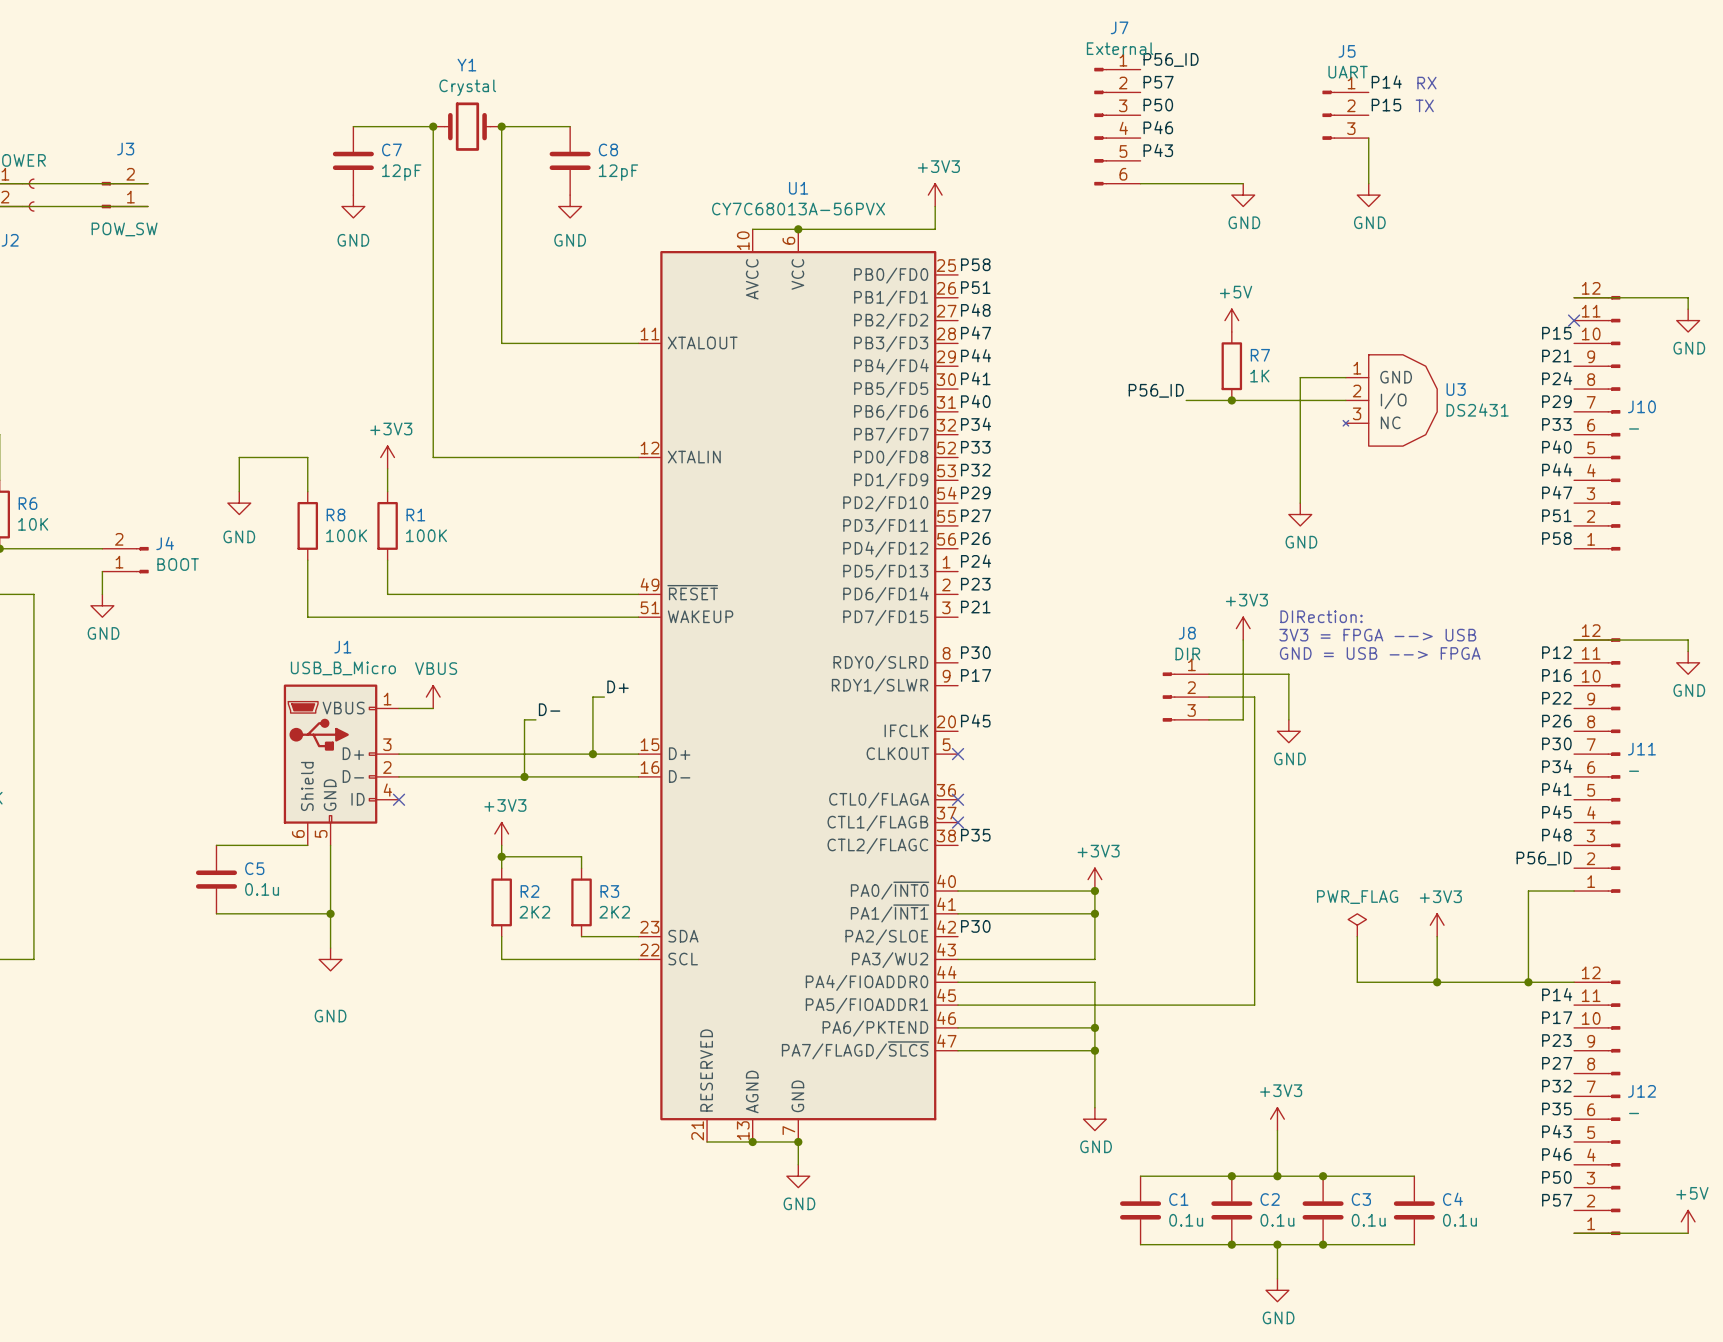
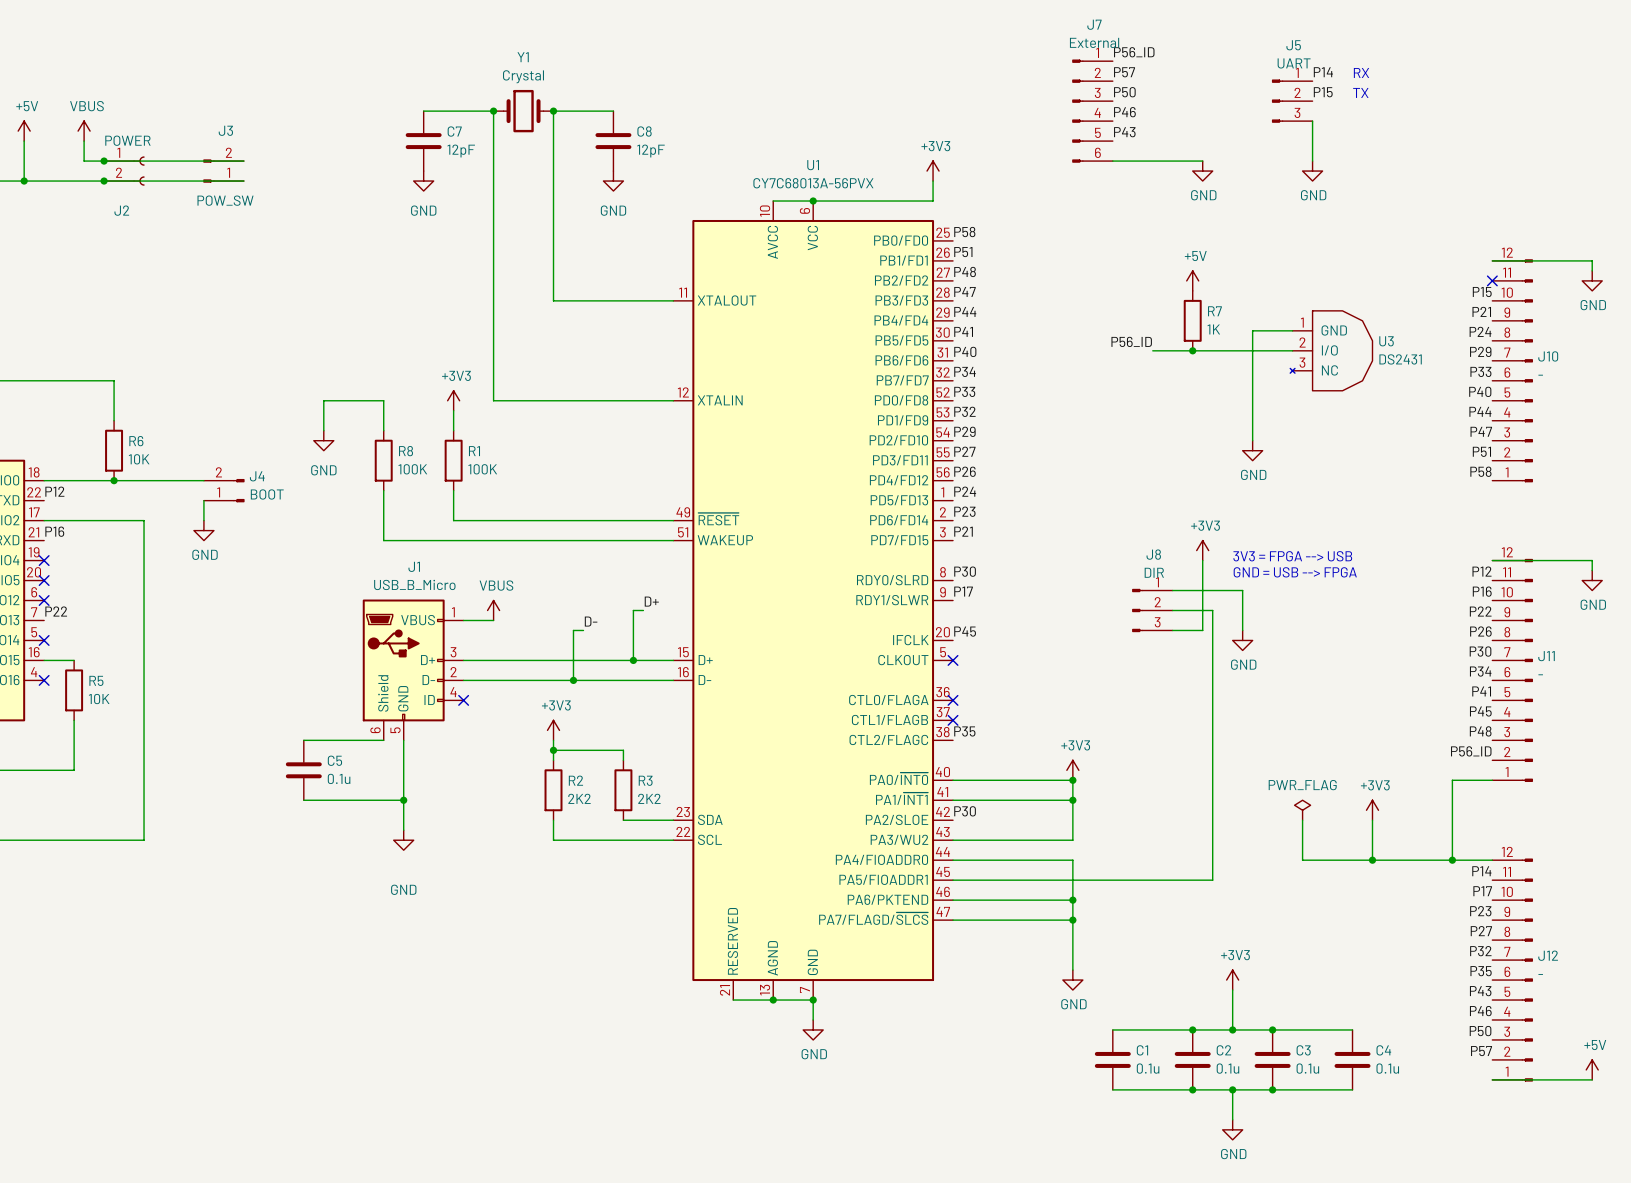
text: DIRection: (1321, 616) -> none

